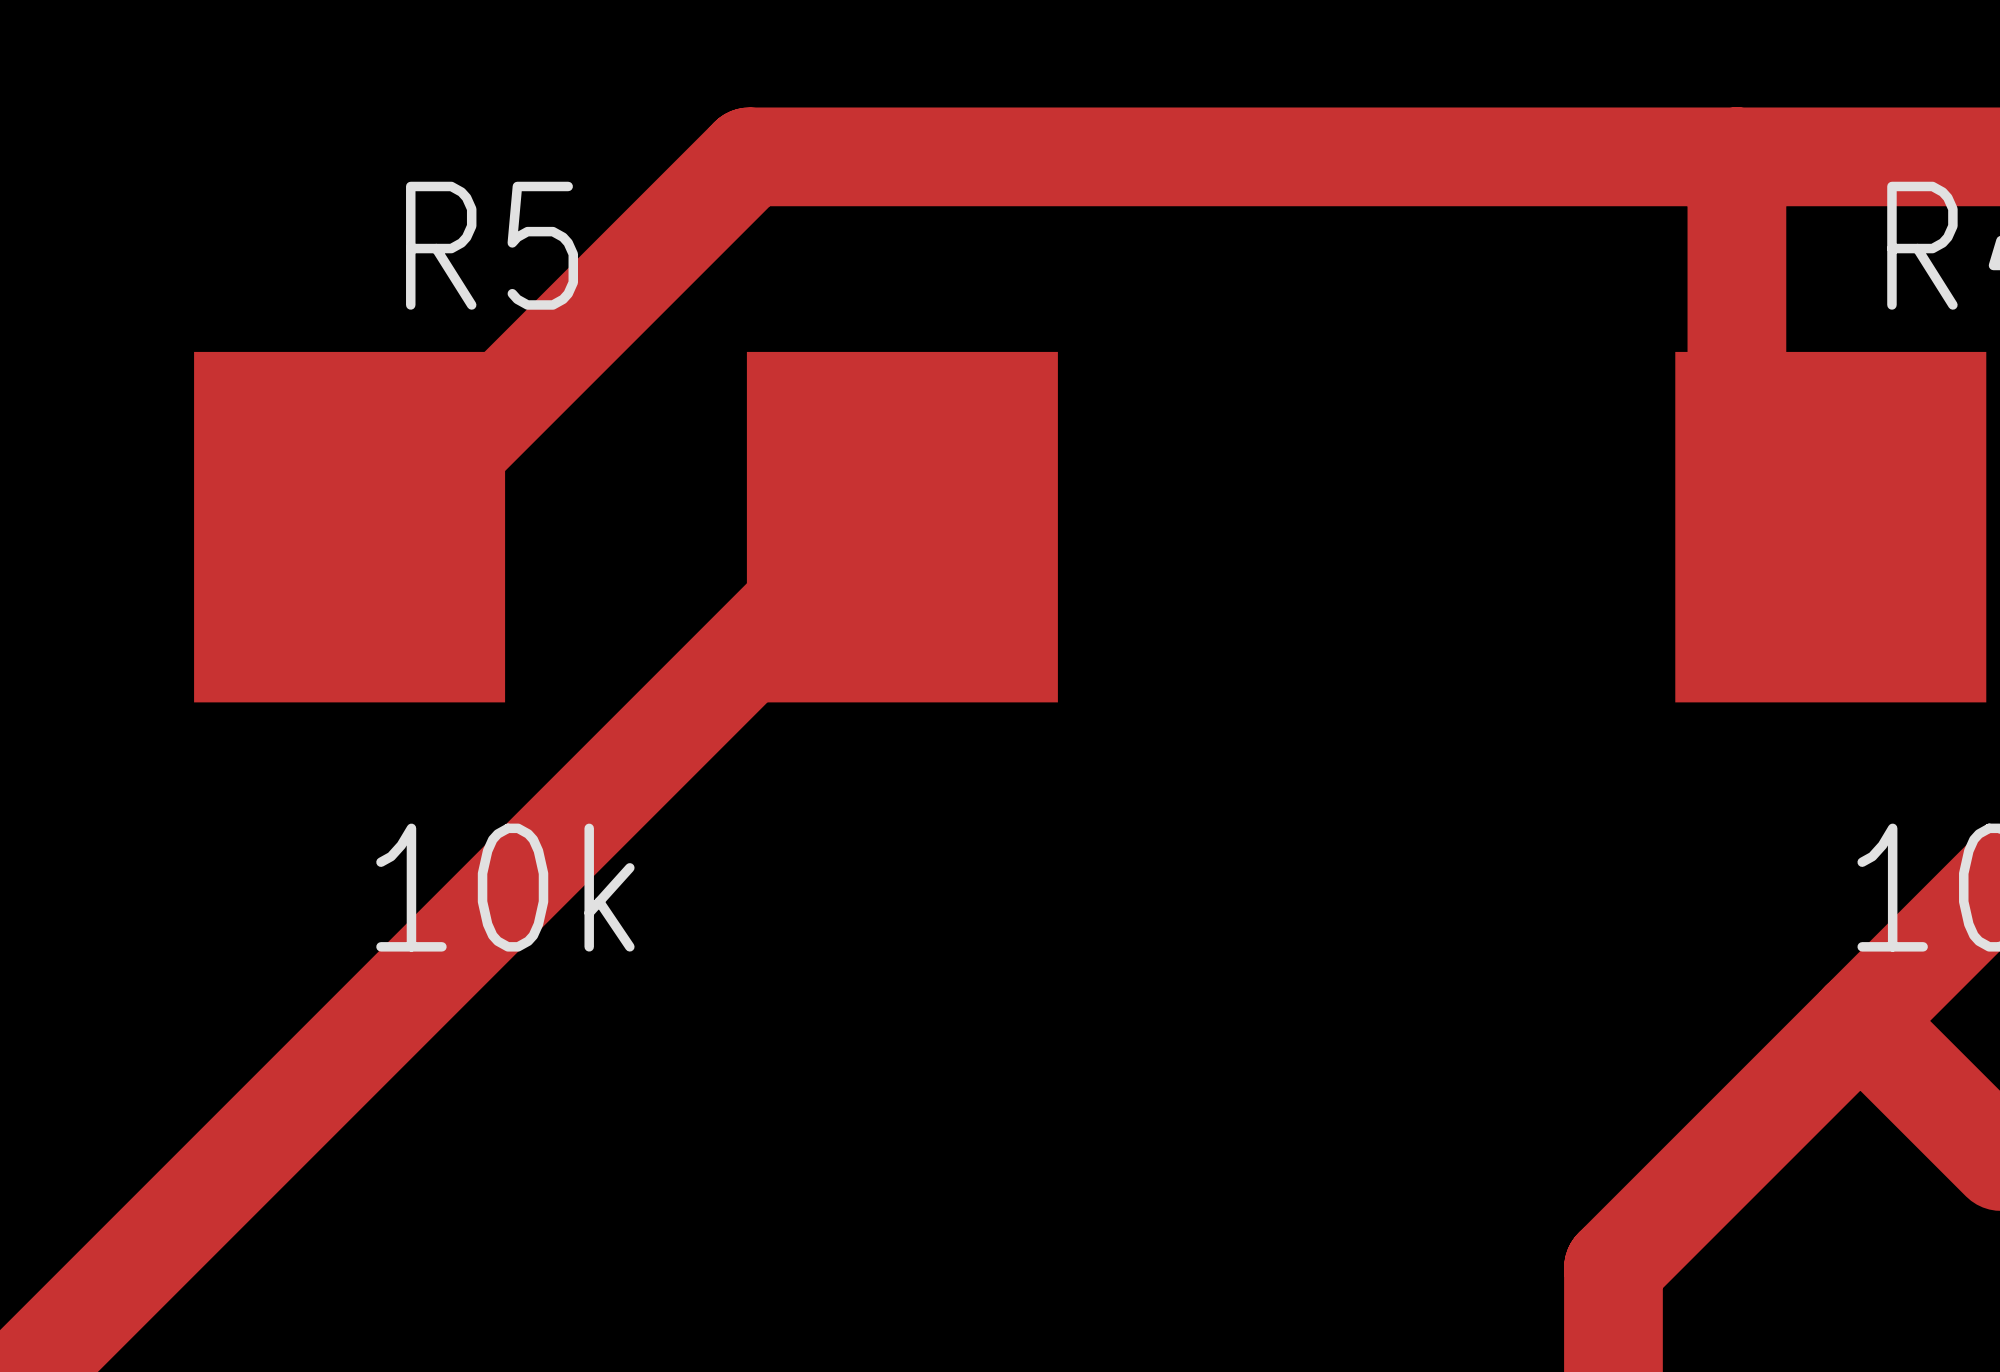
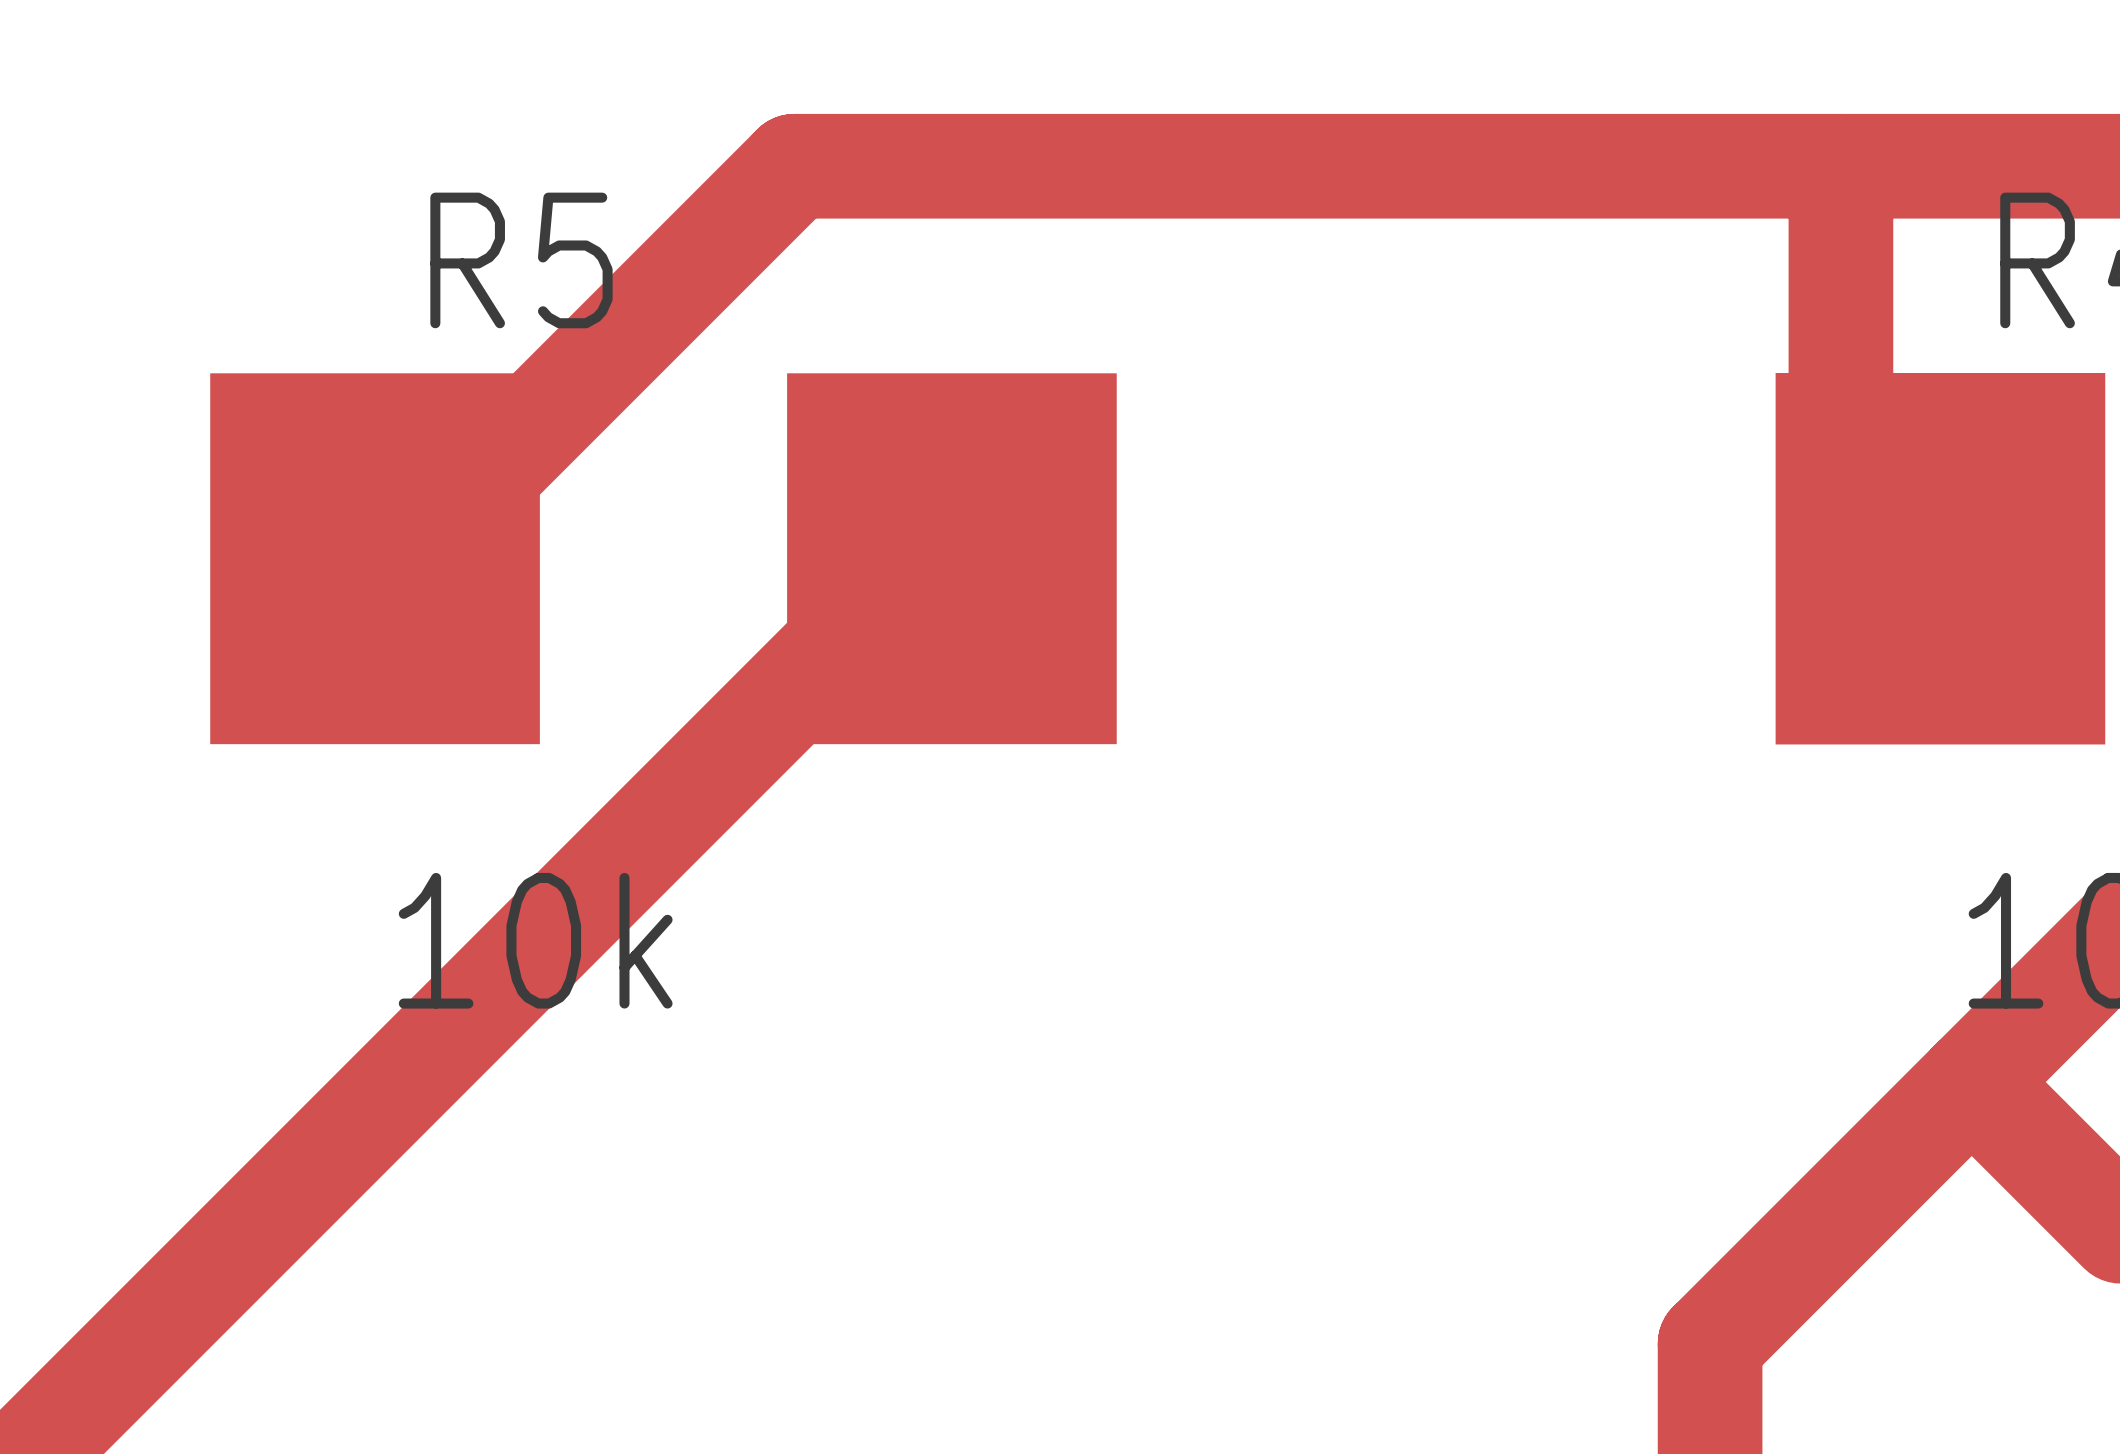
R5 footprint: [194, 351, 1058, 703] -> [210, 373, 1117, 745]

